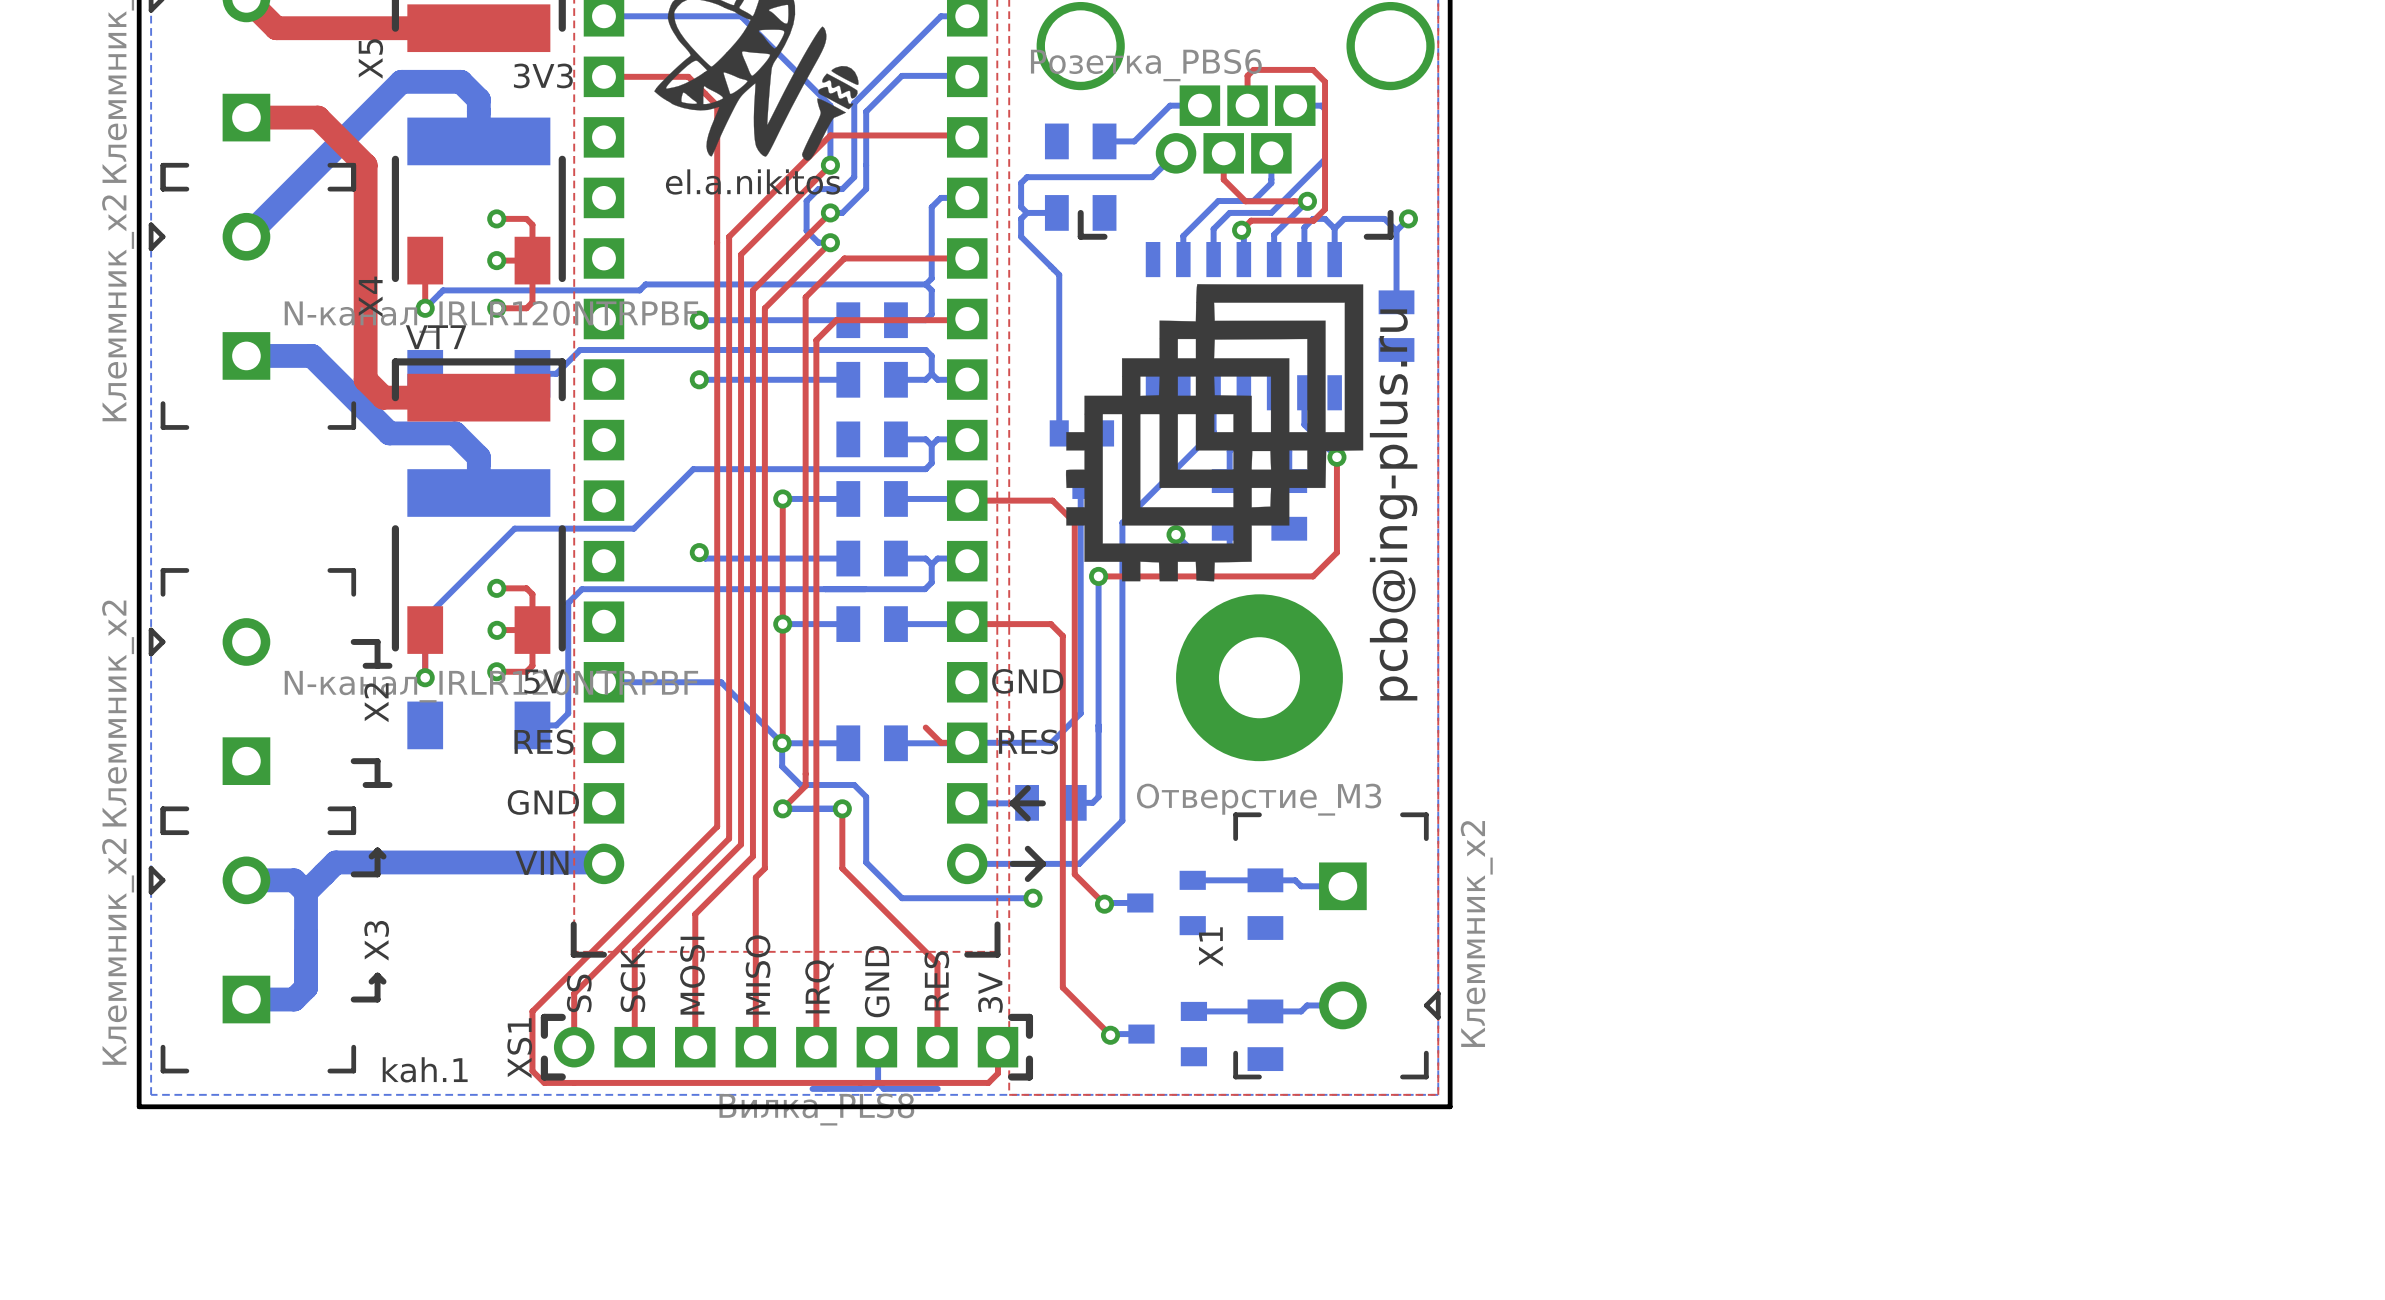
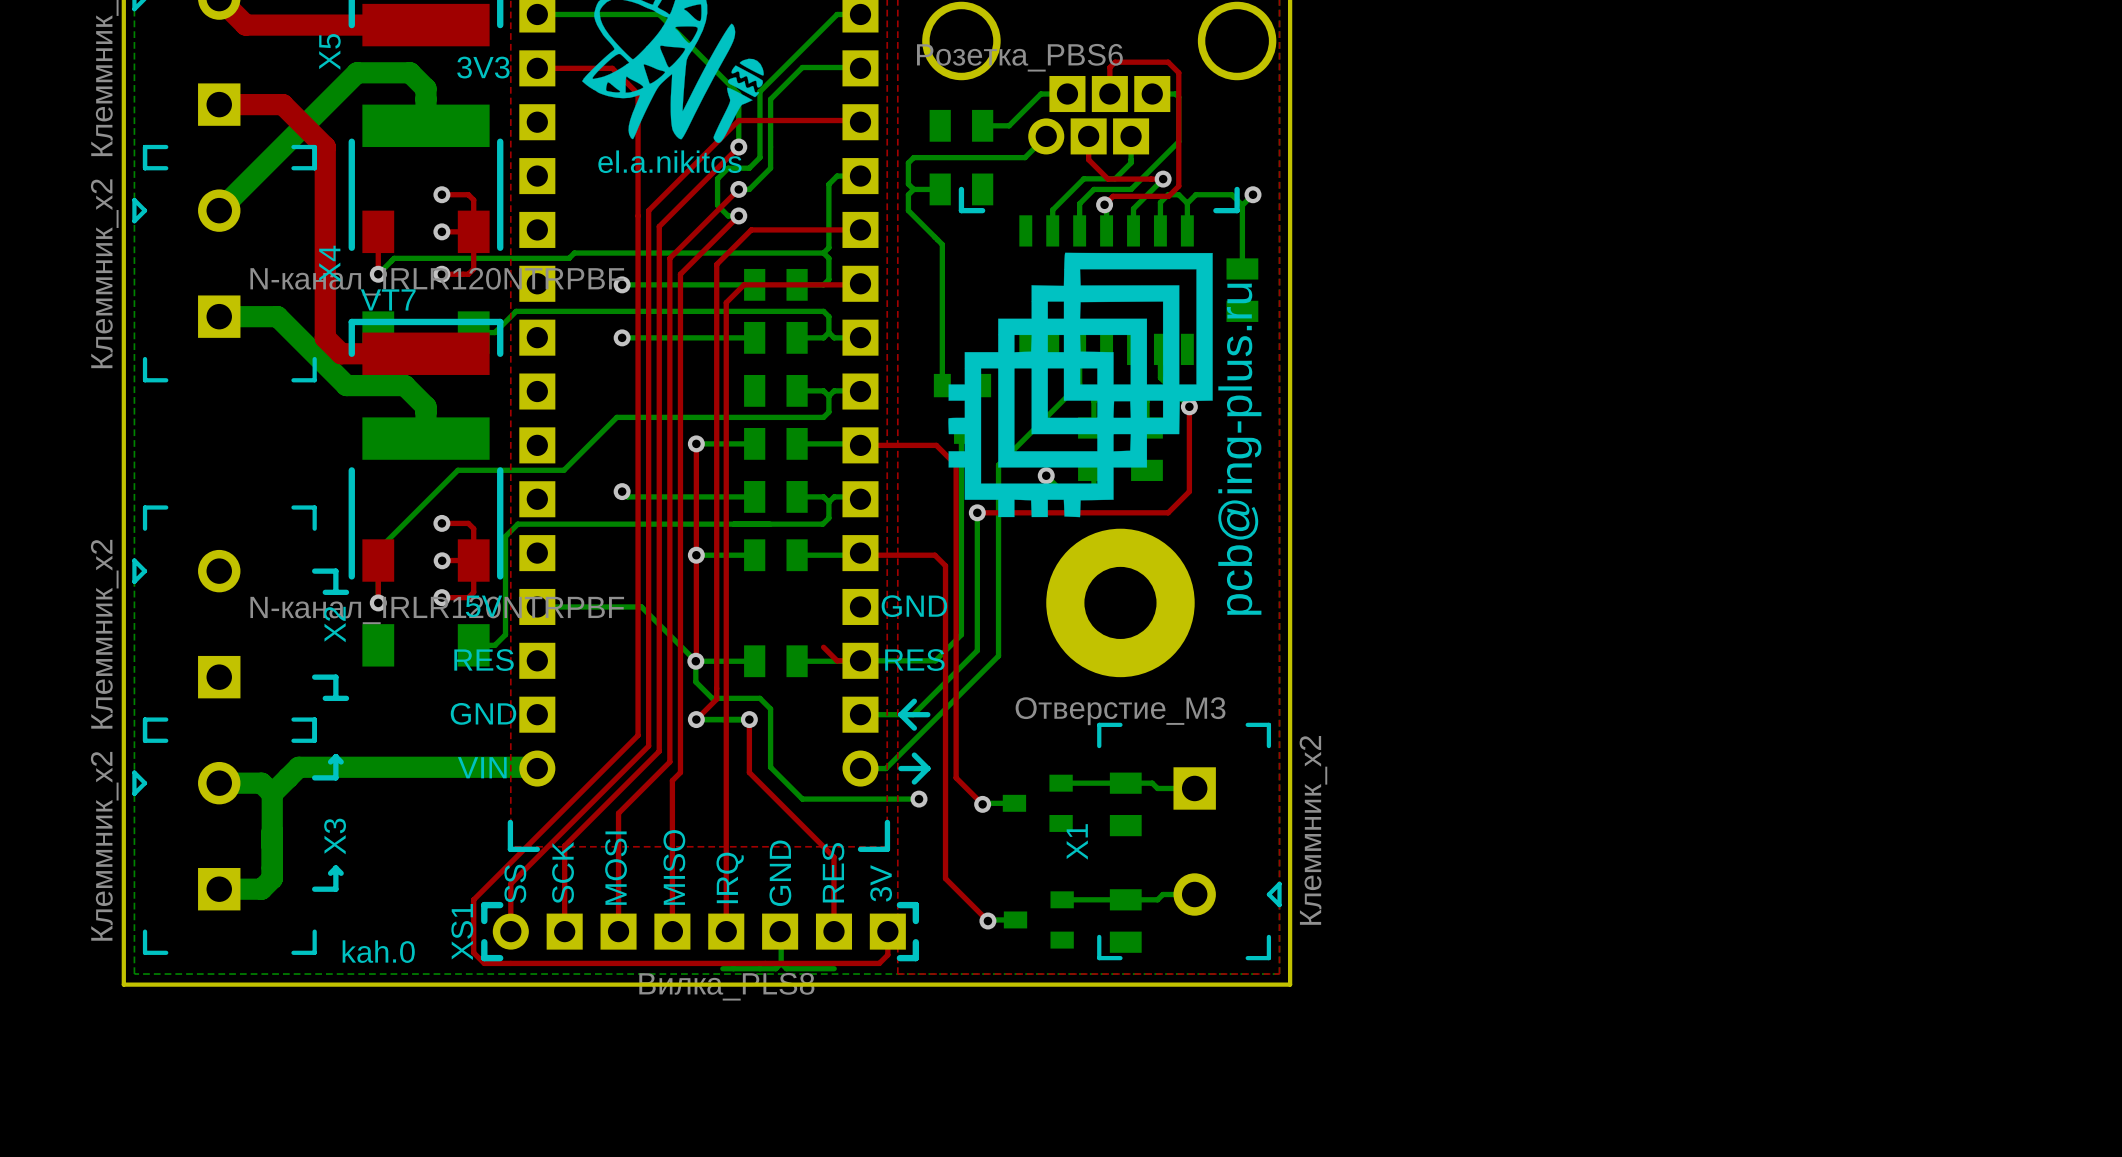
bottom track: (1098, 731) (1098, 796) (1092, 802) (1074, 802) -> (977, 650) (913, 714)
bottom track: (1122, 737) (1122, 820) (1079, 863) (995, 863) -> (998, 655) (885, 768)
part: (1050, 802) -> none
text: kah.1 (425, 1069) -> kah.0 (378, 951)

